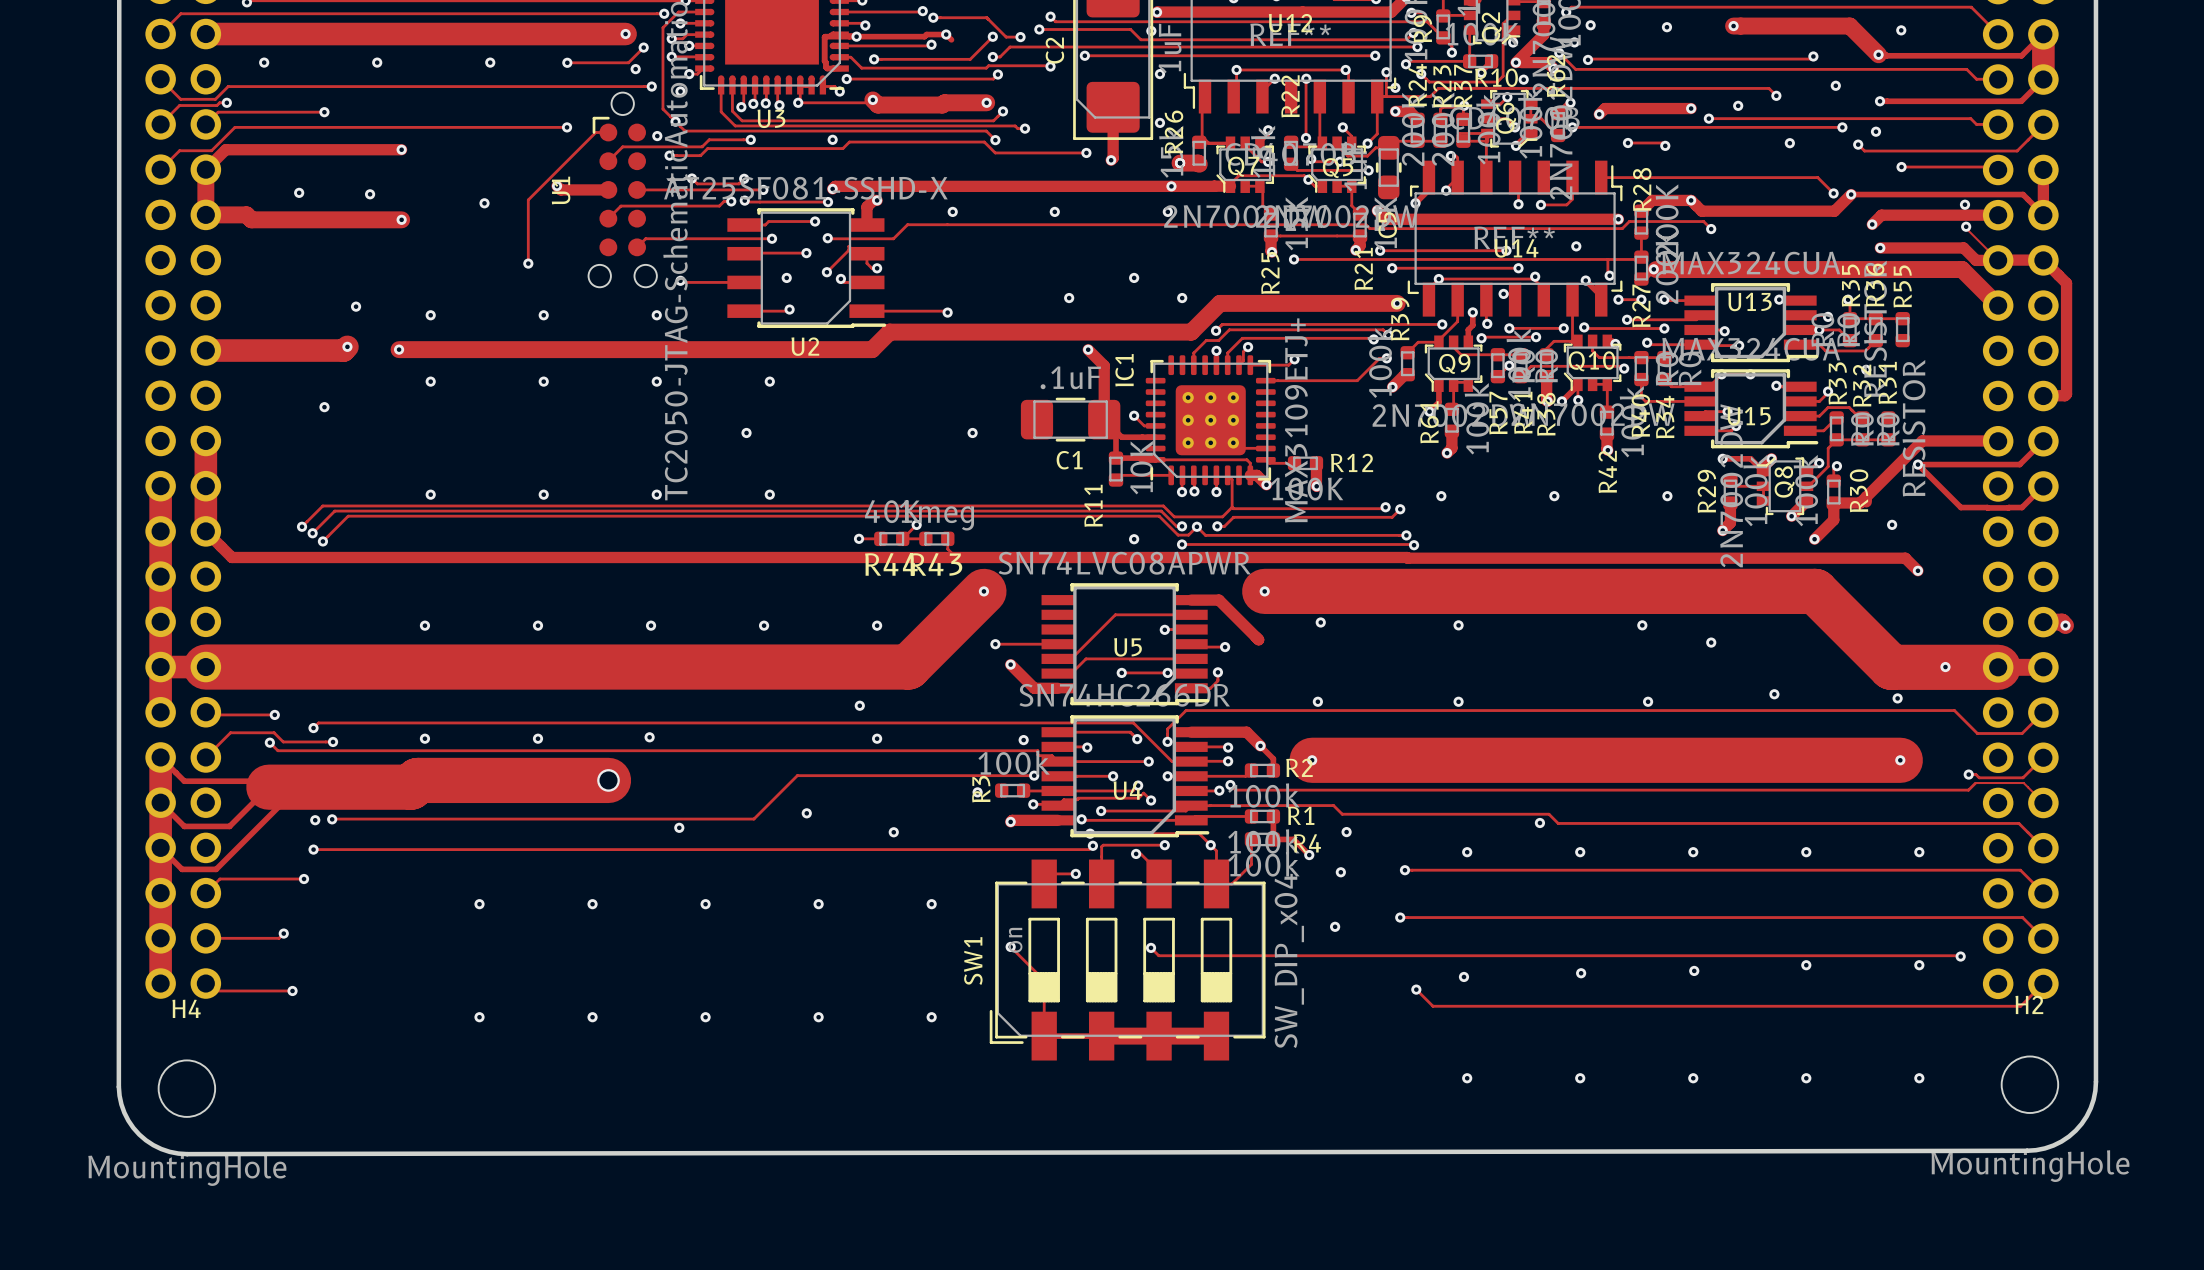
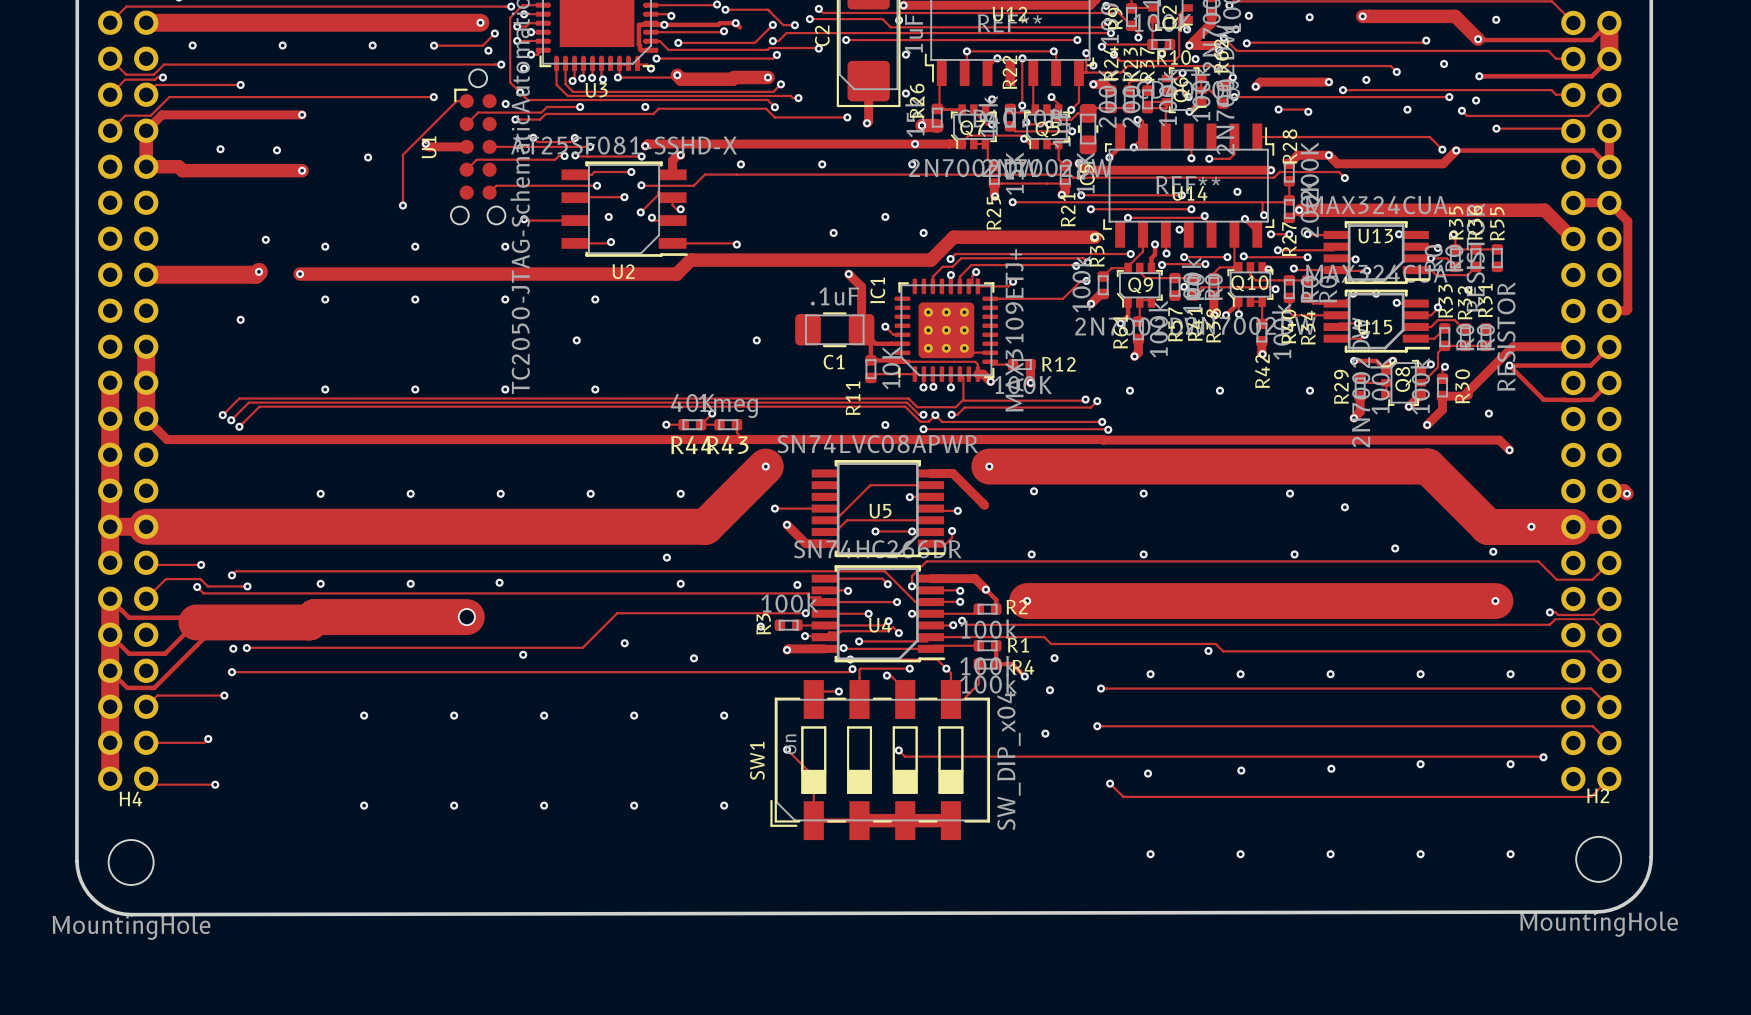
via: (1965, 204) -> none
track: (1998, 215) (1881, 215) (1872, 224) -> none
via: (1872, 224) -> none
track: (1966, 226) (1998, 260) (1976, 260) (1963, 247) (1880, 247) -> none
via: (1966, 226) -> none
via: (1880, 247) -> none

